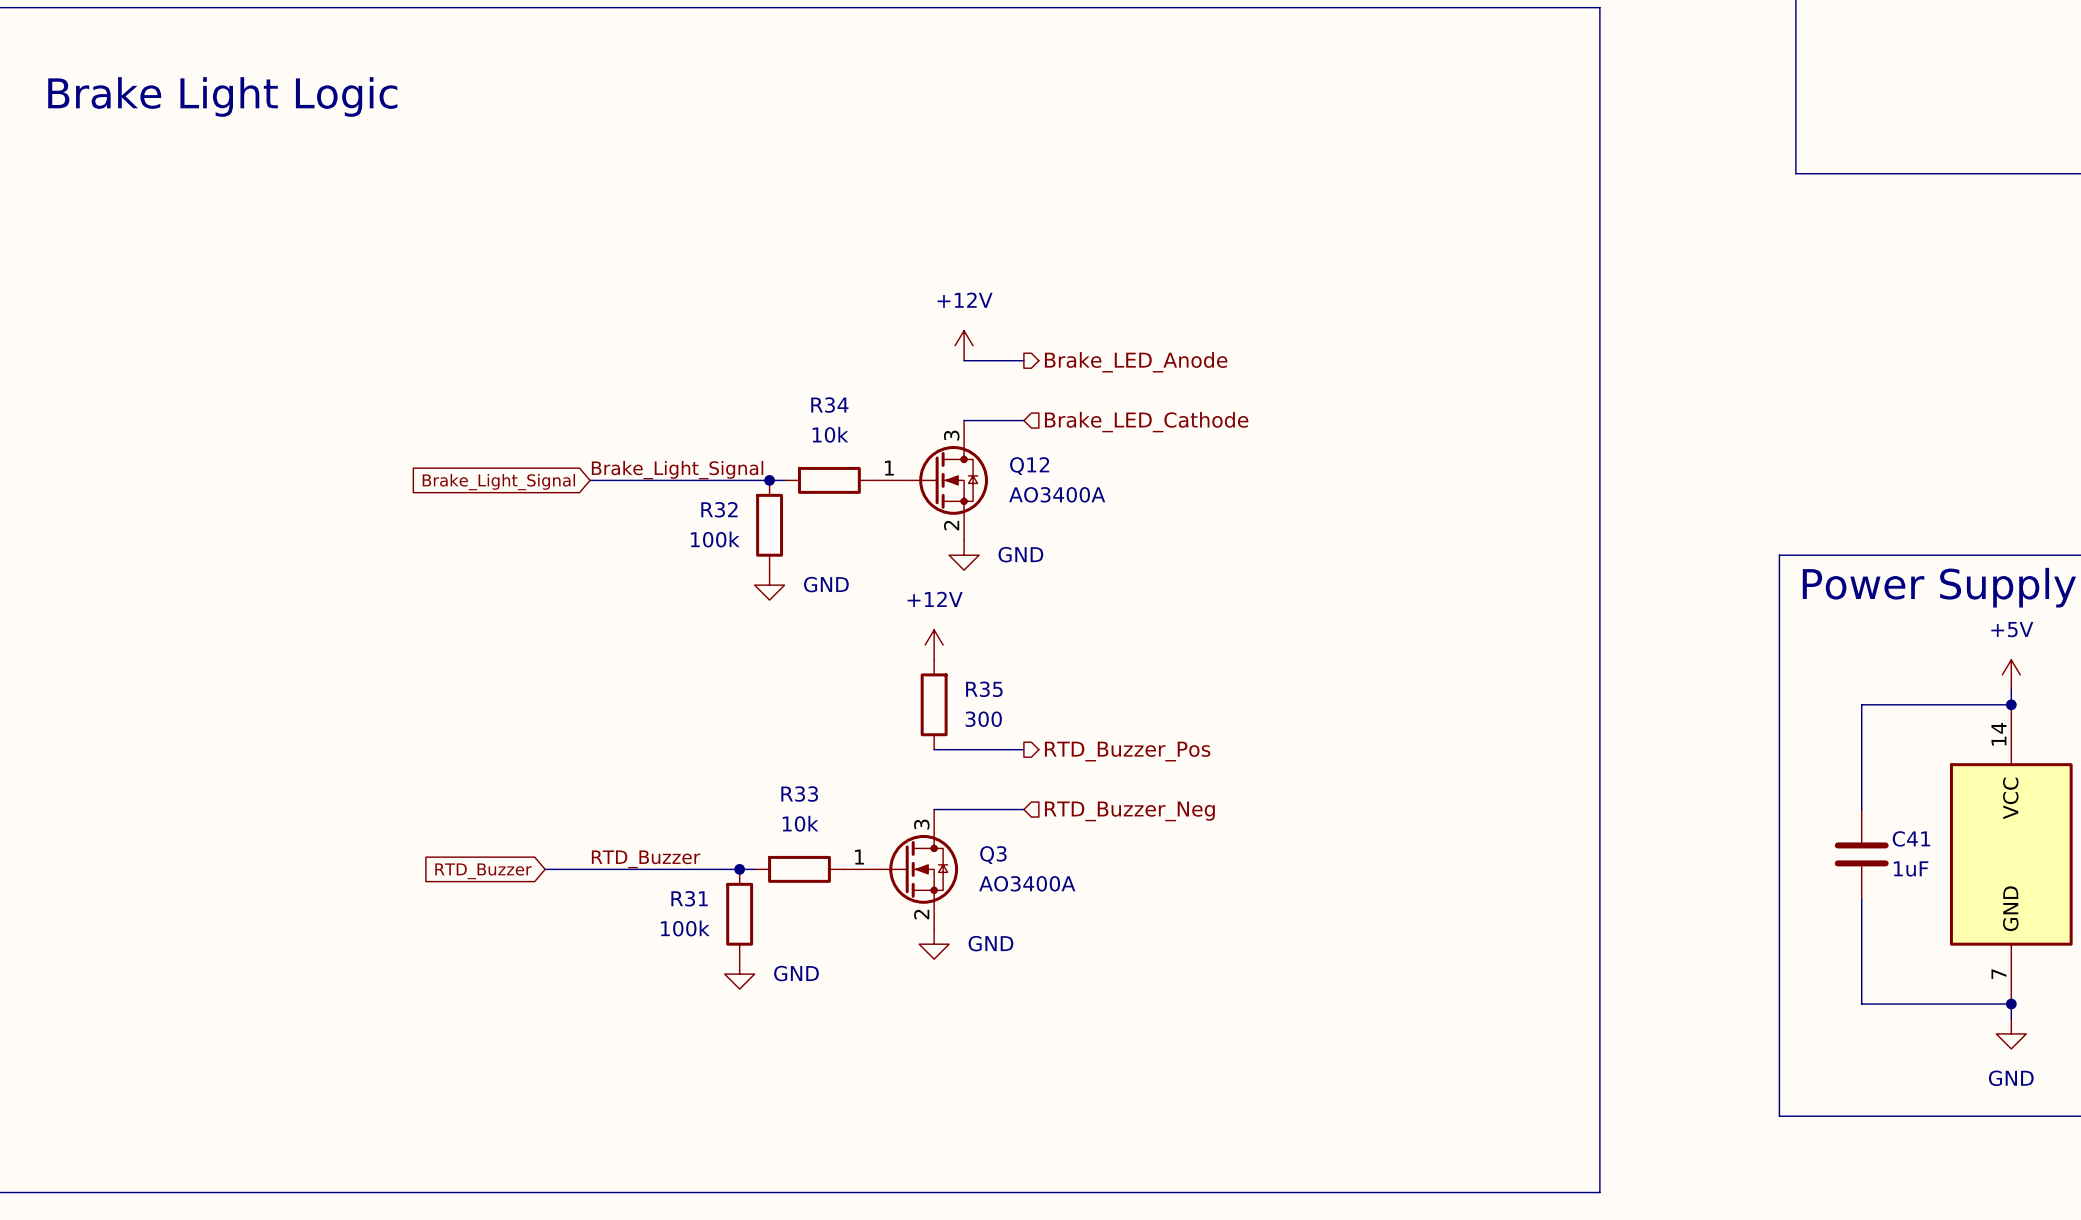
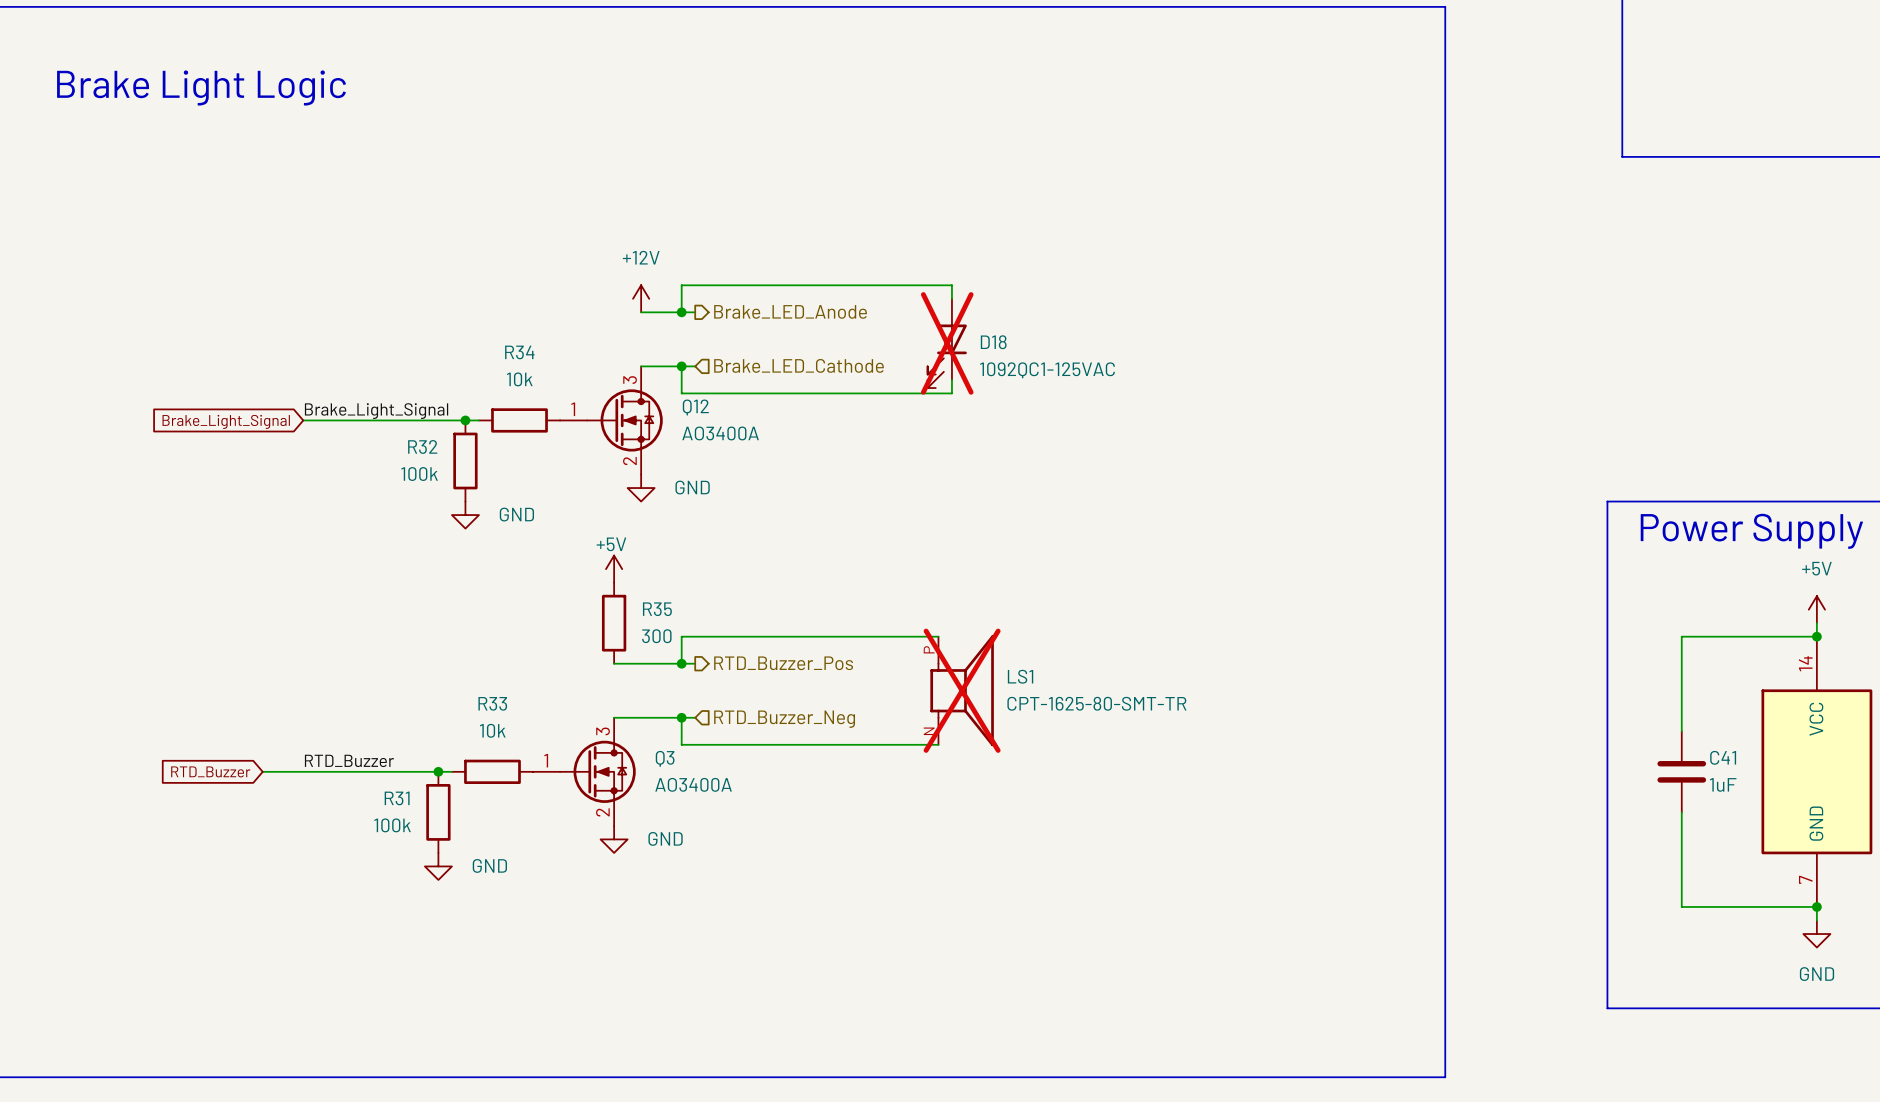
power symbol: none -> +12V (641, 298)
wire: none -> (951, 298) (951, 285) (681, 285) (681, 312)
junction: none -> (681, 312)
power symbol: +12V (964, 345) -> none
wire: (964, 360) (1023, 360) -> (641, 312) (695, 312)
hierarchical label position: Brake_LED_Anode (1136, 362) -> Brake_LED_Anode (790, 311)
D18: none -> 1092QC1-125VAC (947, 343)
wire: none -> (681, 366) (681, 393) (951, 393) (951, 379)
junction: none -> (681, 366)
wire: (964, 420) (1023, 420) -> (641, 366) (695, 366)
hierarchical label position: Brake_LED_Cathode (1146, 422) -> Brake_LED_Cathode (798, 365)
junction: none -> (465, 420)
label position: Brake_Light_Signal (677, 470) -> Brake_Light_Signal (376, 411)
wire: (590, 480) (784, 480) -> (303, 420) (478, 420)
junction: (769, 480) -> none
R34 position: (829, 480) -> (519, 420)
Q12 position: (931, 480) -> (611, 420)
global label position: Brake_Light_Signal (498, 482) -> Brake_Light_Signal (226, 421)
R32 position: (769, 525) -> (465, 461)
power symbol: GND (964, 555) -> none
power symbol: none -> GND (465, 515)
power symbol position: GND (769, 585) -> GND (641, 488)
power symbol: none -> +5V (614, 569)
power symbol: +12V (934, 644) -> none
R35 position: (934, 704) -> (614, 623)
wire: none -> (938, 636) (681, 636) (681, 663)
junction: none -> (681, 663)
wire: (934, 749) (1023, 749) -> (614, 663) (695, 663)
hierarchical label position: RTD_Buzzer_Pos (1127, 751) -> RTD_Buzzer_Pos (783, 663)
LS1: none -> CPT-1625-80-SMT-TR (962, 690)
wire: none -> (681, 717) (681, 744) (938, 744)
junction: none -> (681, 717)
wire: (934, 809) (1023, 809) -> (614, 717) (695, 717)
hierarchical label position: RTD_Buzzer_Neg (1129, 811) -> RTD_Buzzer_Neg (784, 719)
junction: none -> (438, 771)
label position: RTD_Buzzer (646, 859) -> RTD_Buzzer (349, 760)
wire: (545, 869) (754, 869) -> (262, 771) (451, 771)
junction: (739, 869) -> none
R33 position: (799, 869) -> (492, 771)
Q3 position: (901, 869) -> (584, 771)
global label position: RTD_Buzzer (483, 871) -> RTD_Buzzer (210, 771)
R31 position: (739, 914) -> (438, 812)
power symbol: GND (934, 944) -> none
power symbol: none -> GND (438, 866)
power symbol position: GND (739, 974) -> GND (614, 839)

